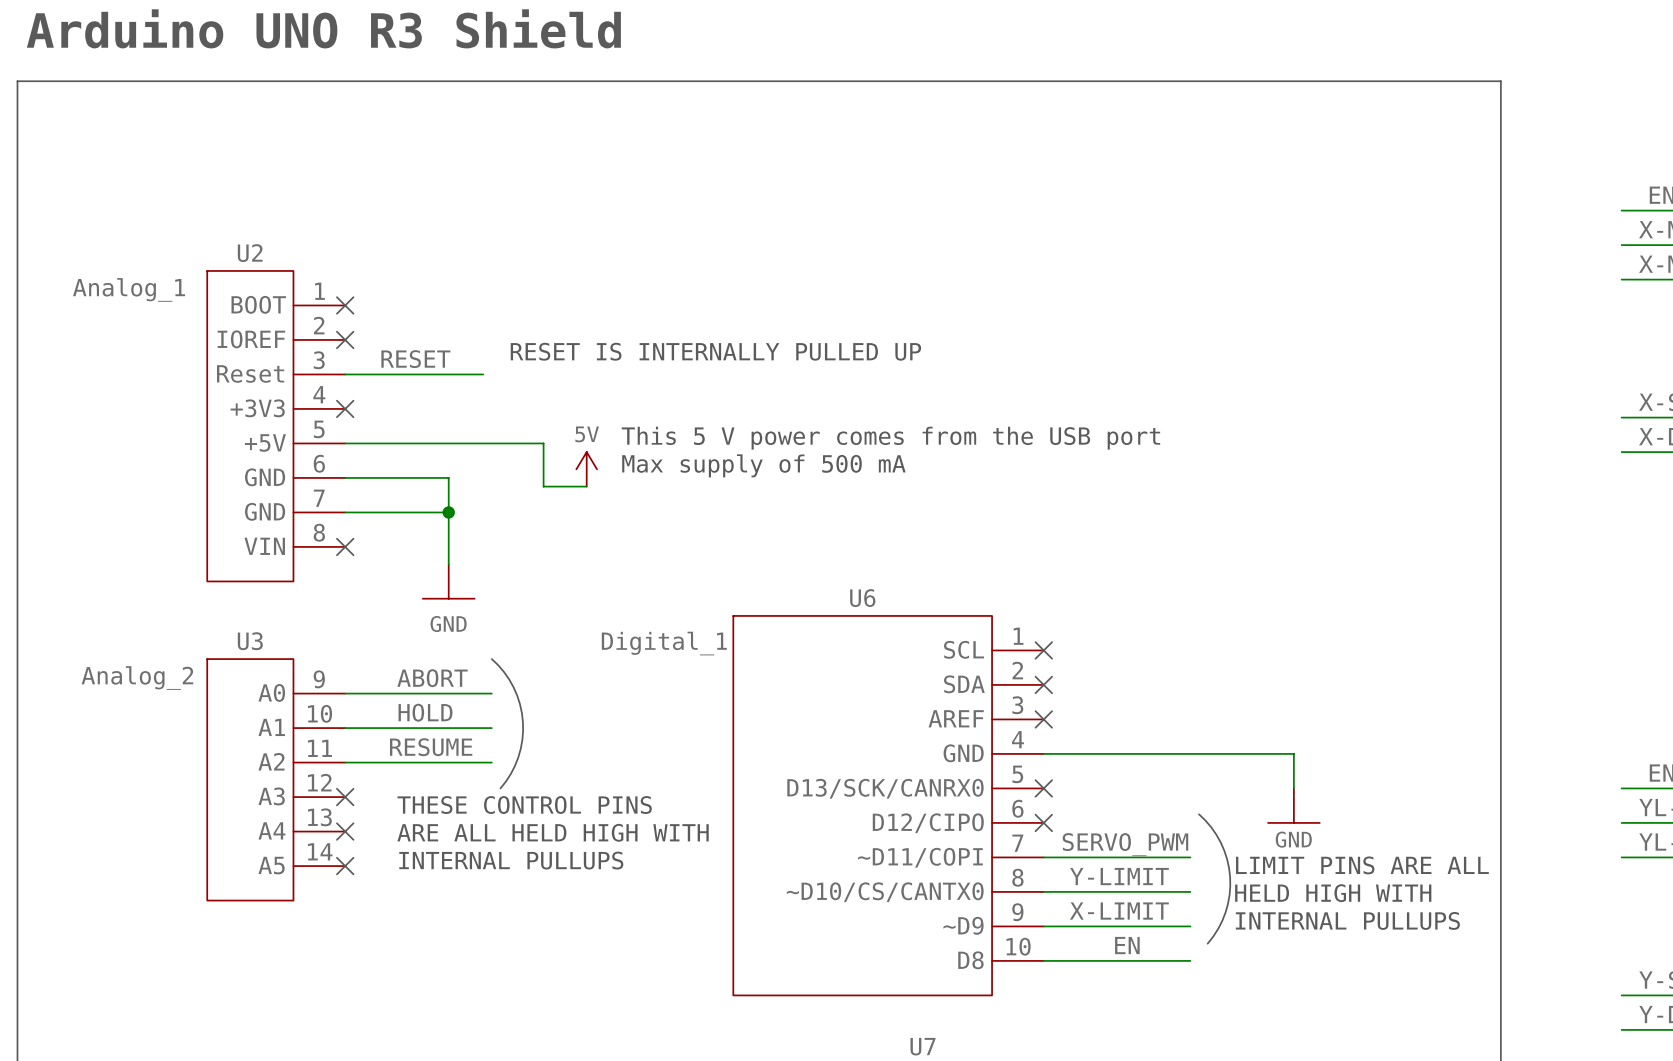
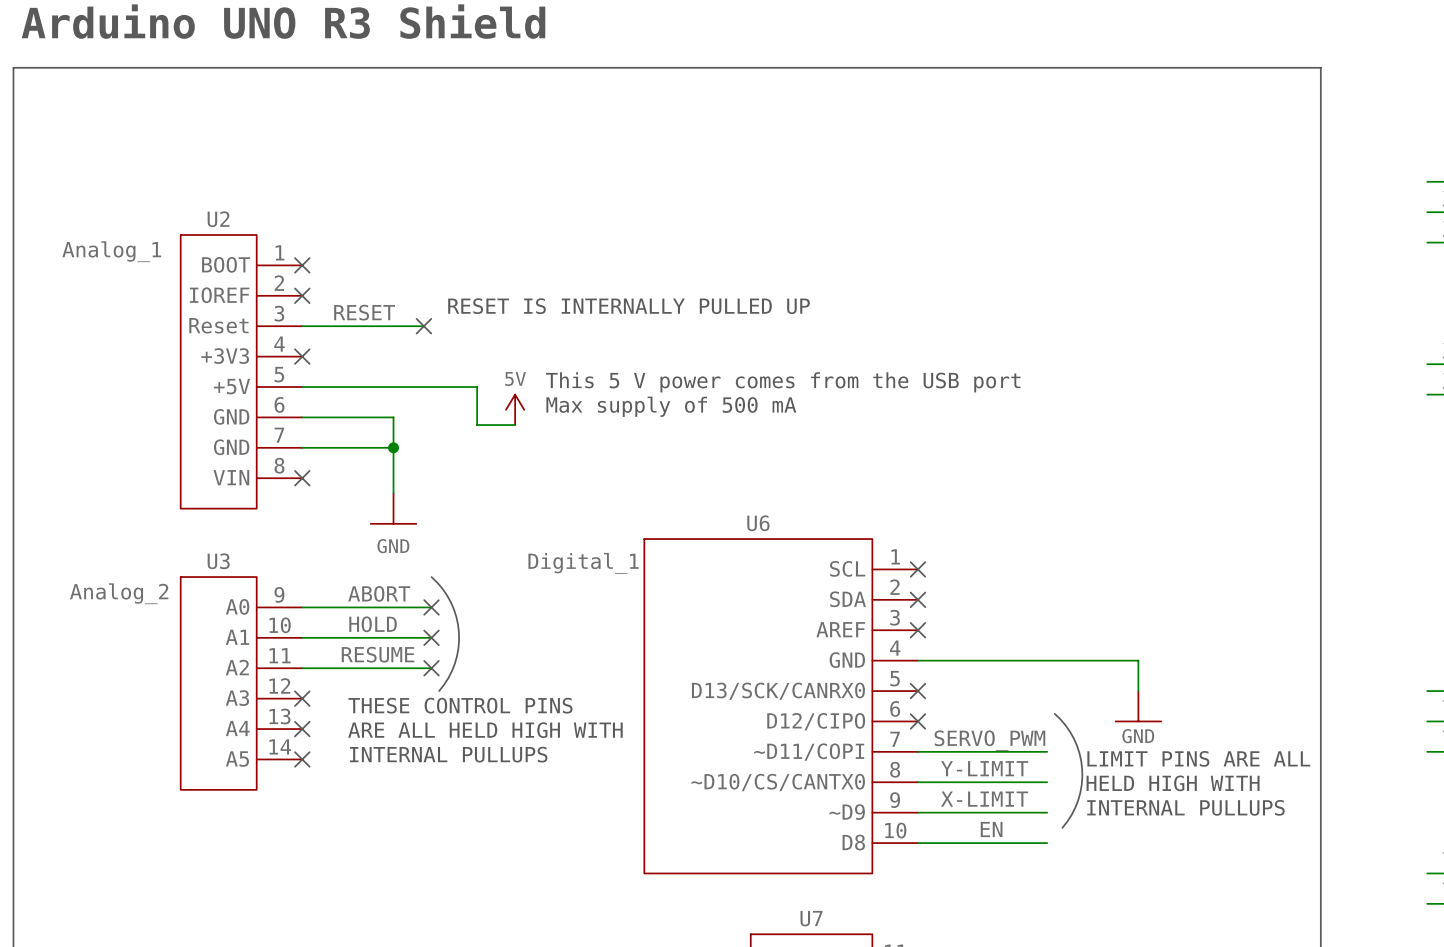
no-connect mark: none -> (423, 326)
no-connect mark: none -> (431, 607)
no-connect mark: none -> (431, 637)
no-connect mark: none -> (431, 668)

